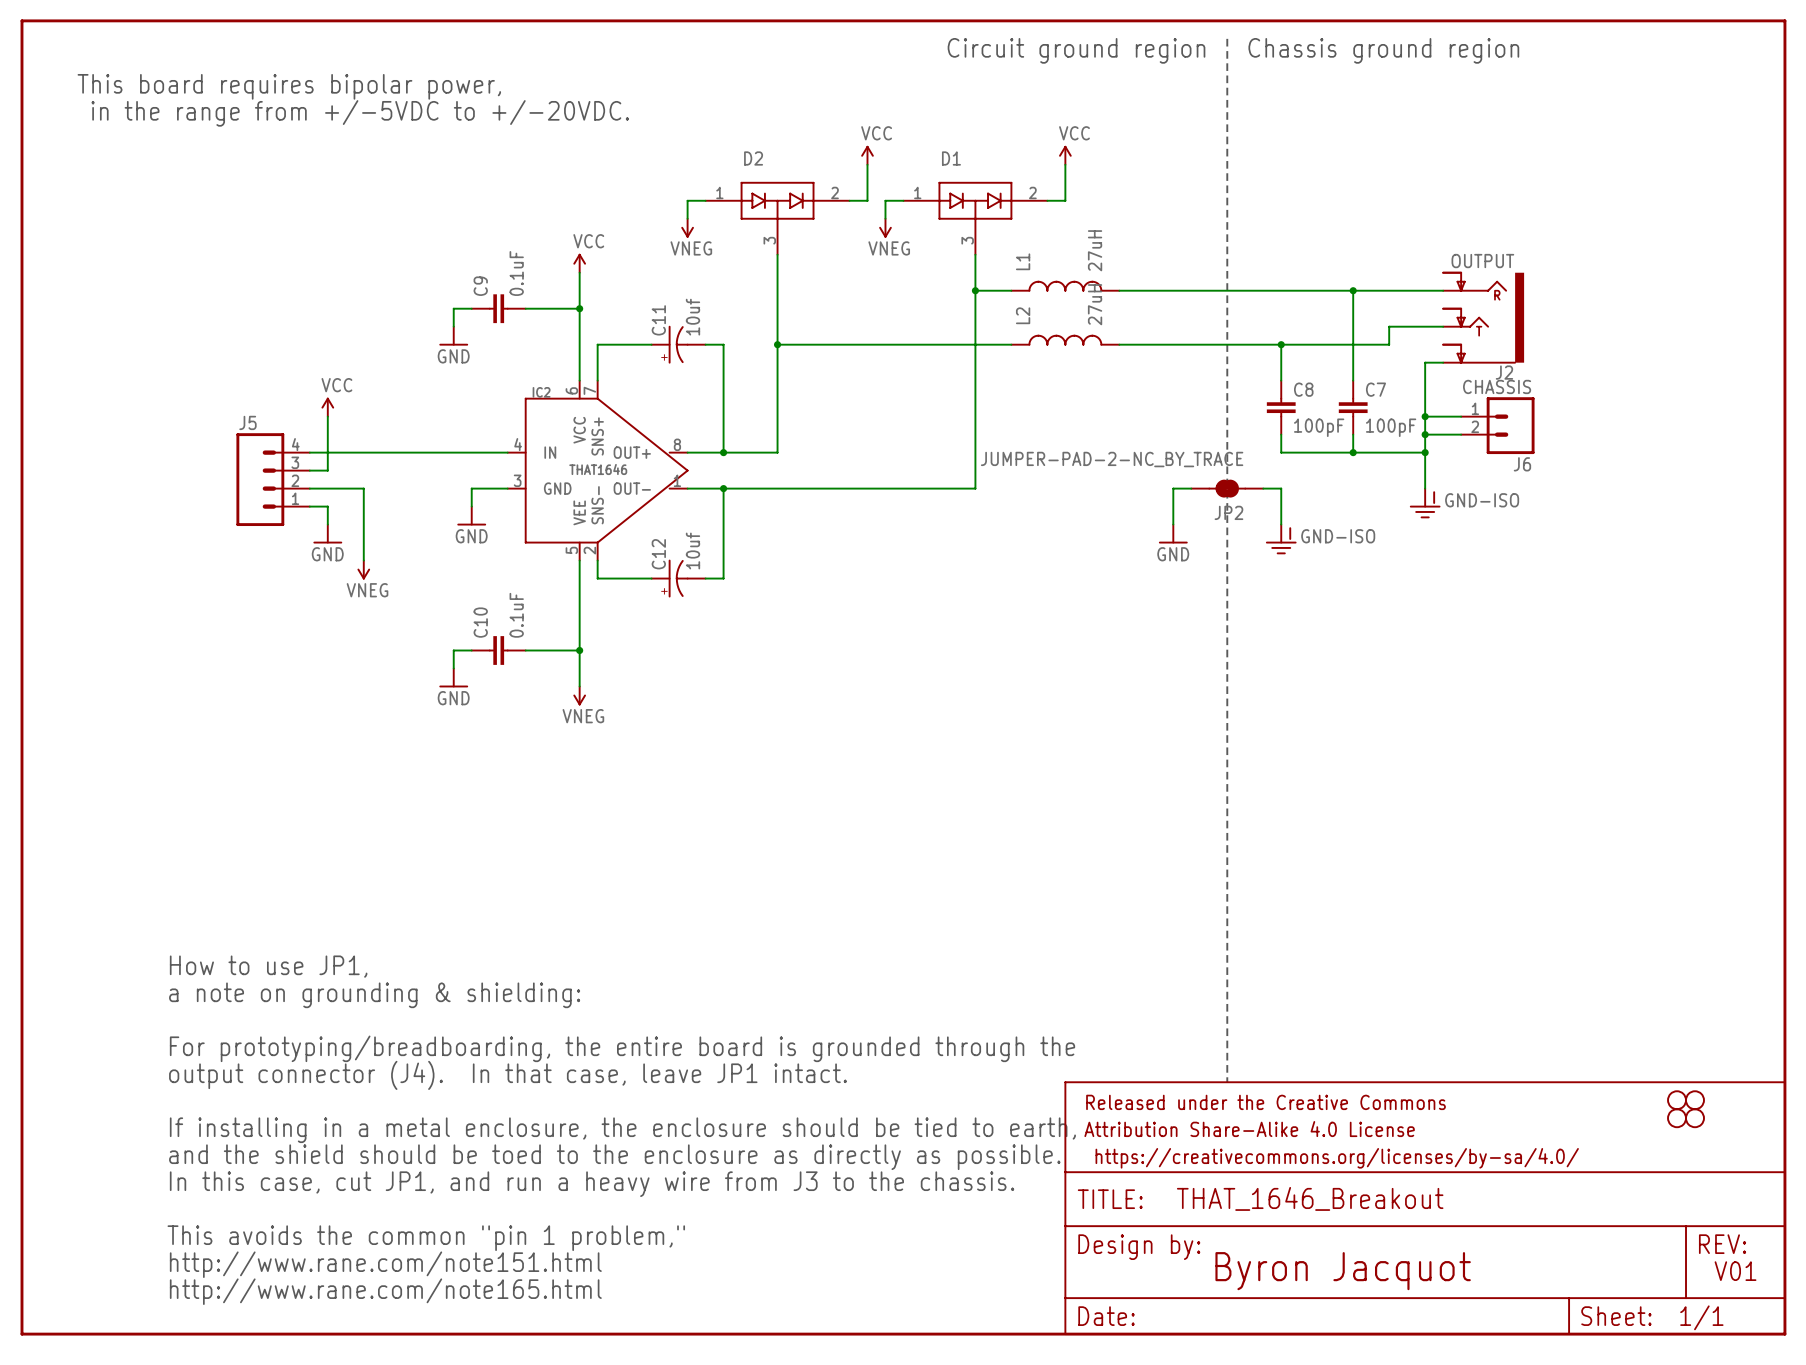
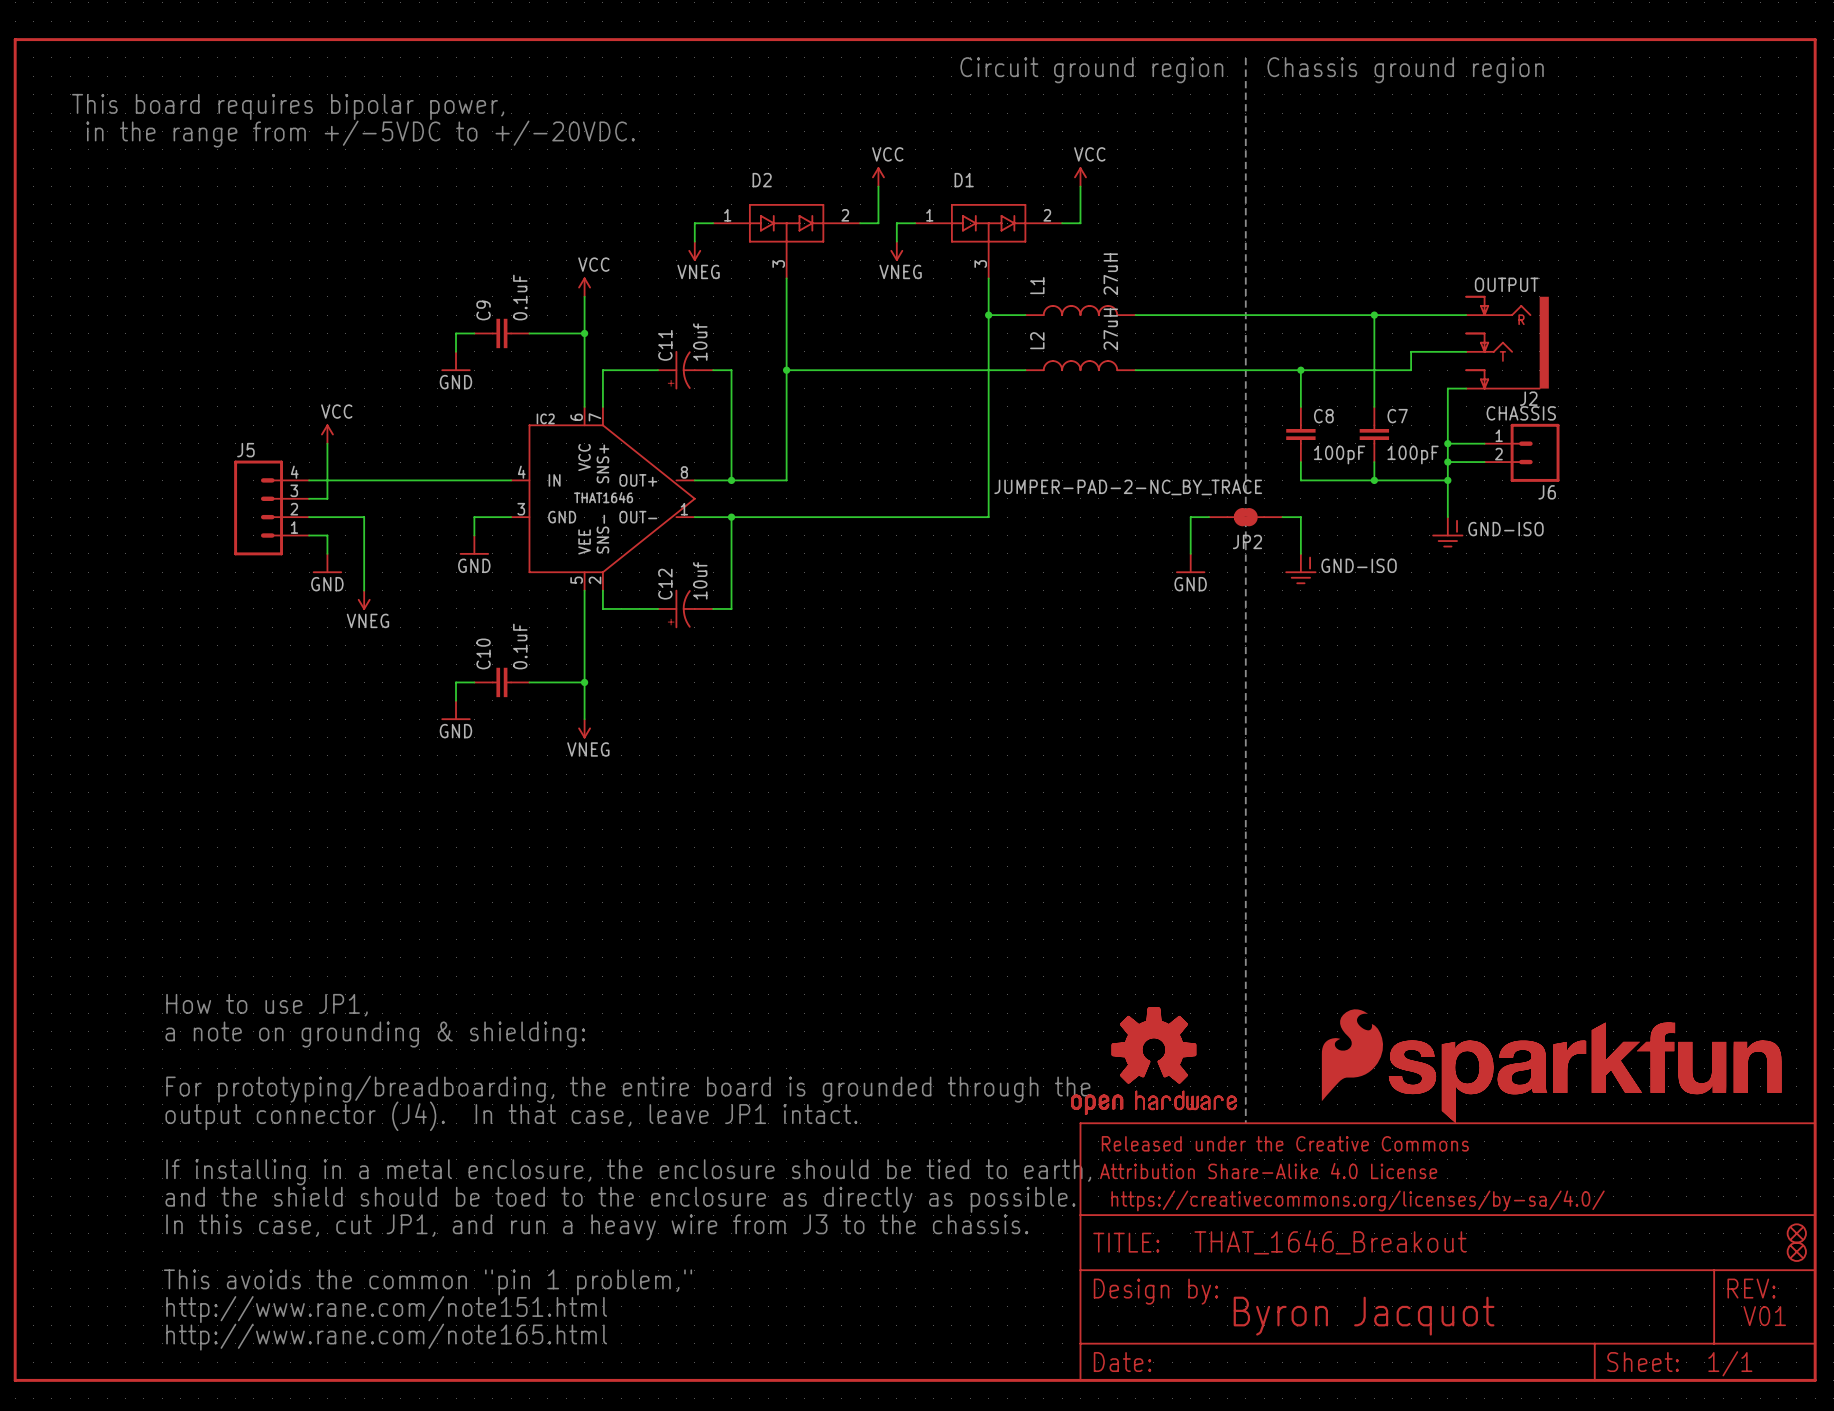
part: none -> (1352, 1055)
part: none -> (1153, 1061)
part: none -> (1585, 1072)
part: (1677, 1100) -> none
part: (1695, 1100) -> none
part: (1677, 1118) -> none
part: (1695, 1118) -> none
part: none -> (1796, 1233)
part: none -> (1796, 1251)

